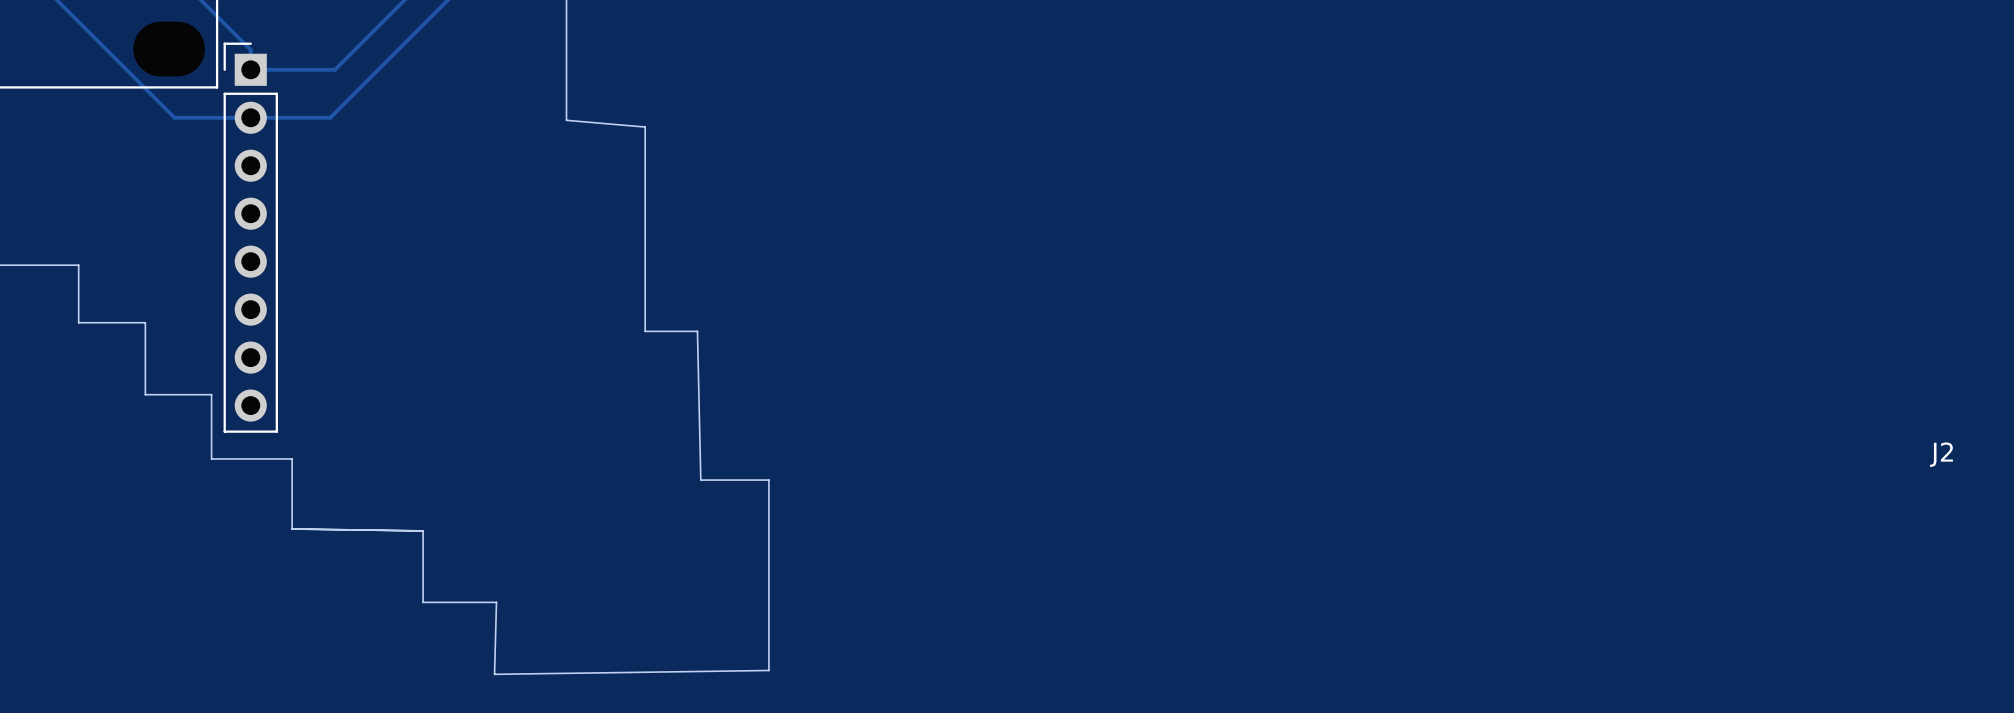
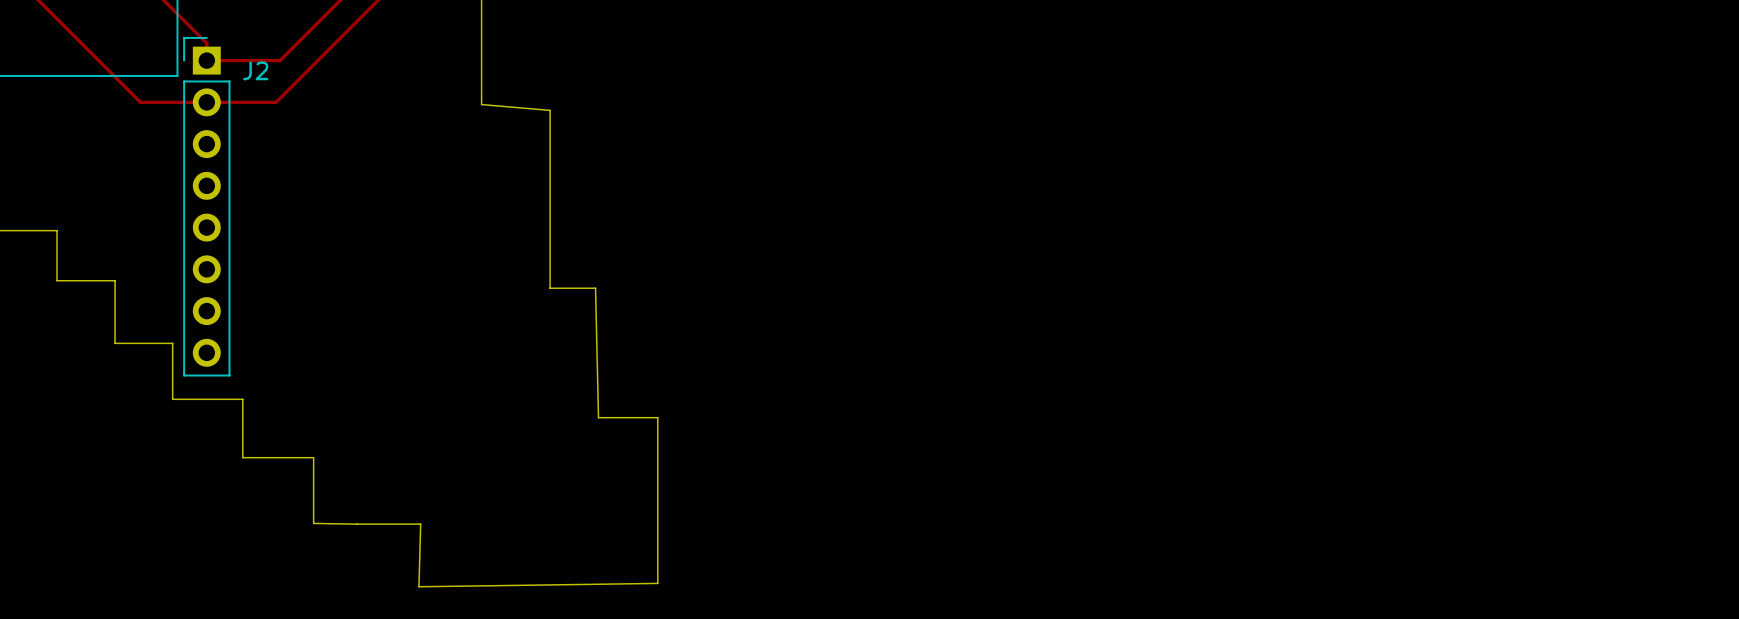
J2 name position: J2 (1941, 454) -> J2 (255, 70)
board edge: (292, 526) (292, 529) (423, 530) (423, 602) -> (242, 457) (313, 457) (313, 523) (356, 524)

